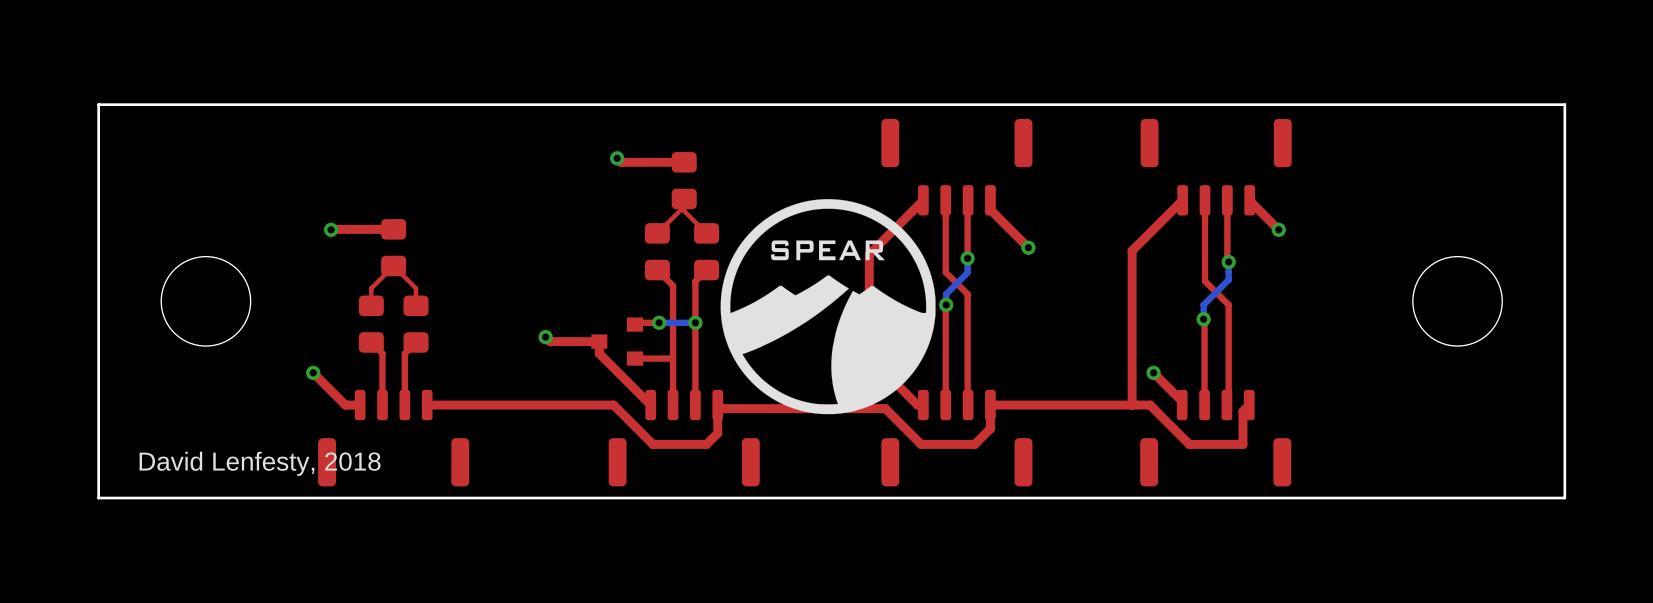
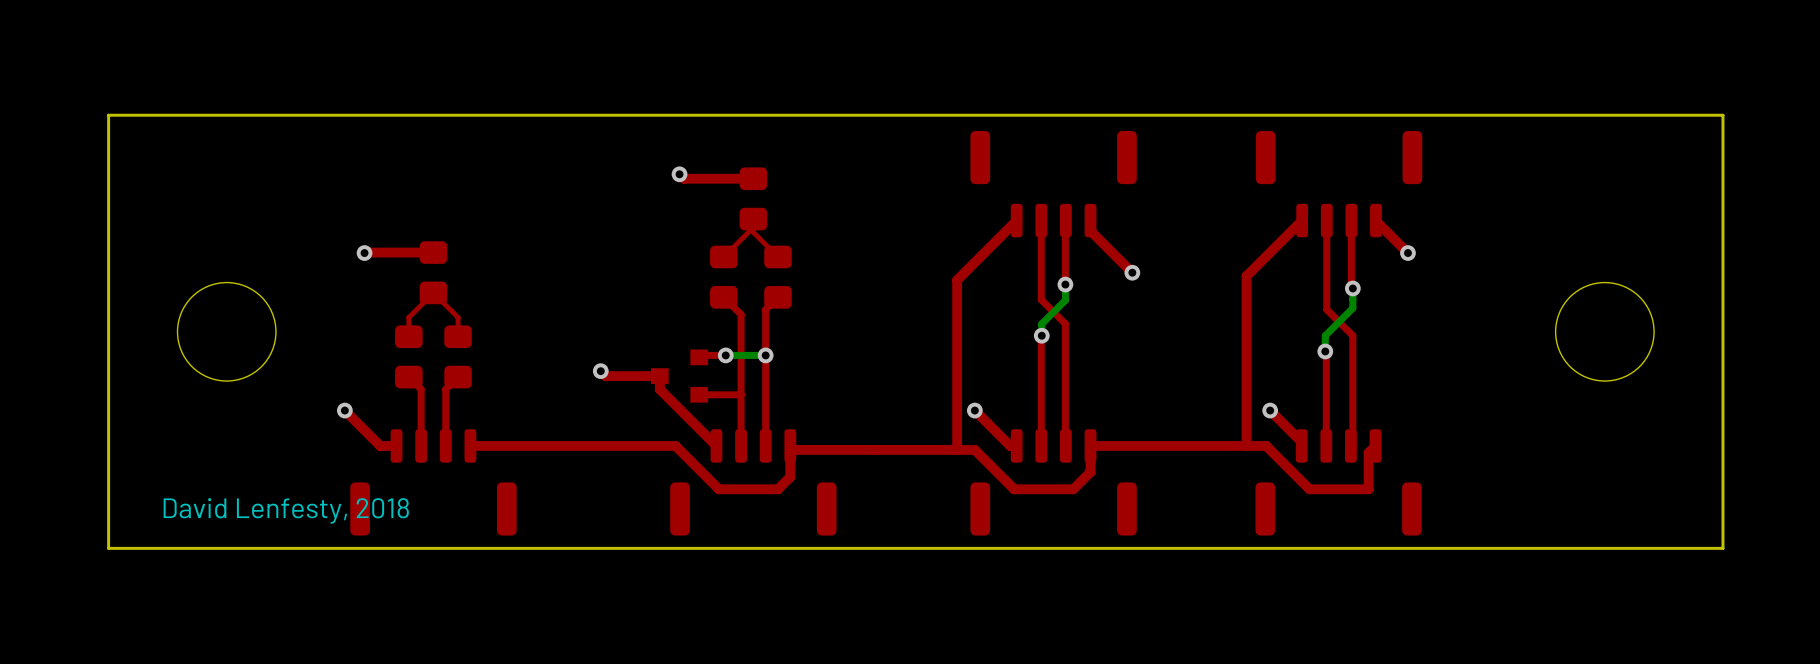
drawing: [720, 199, 936, 415] -> none

